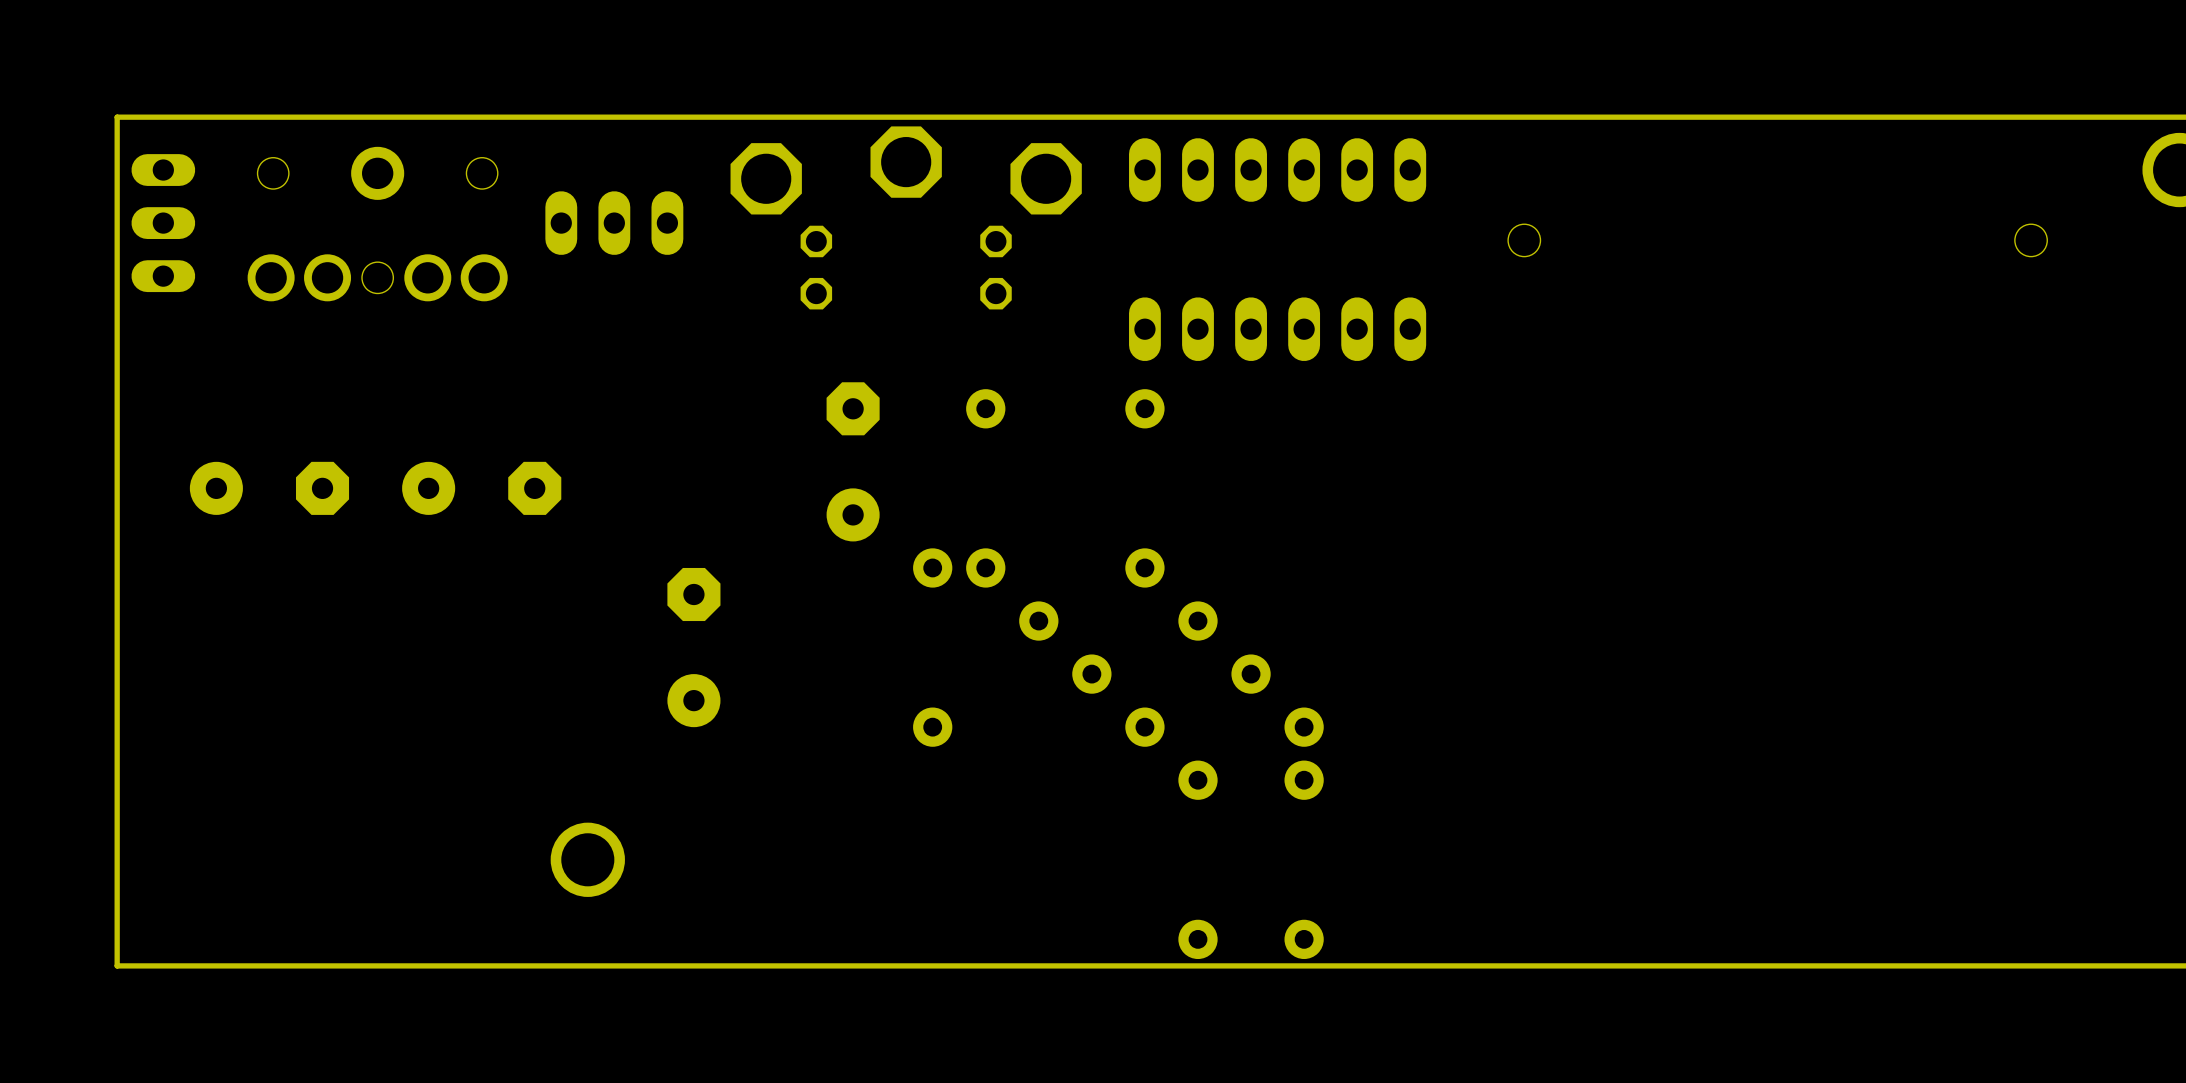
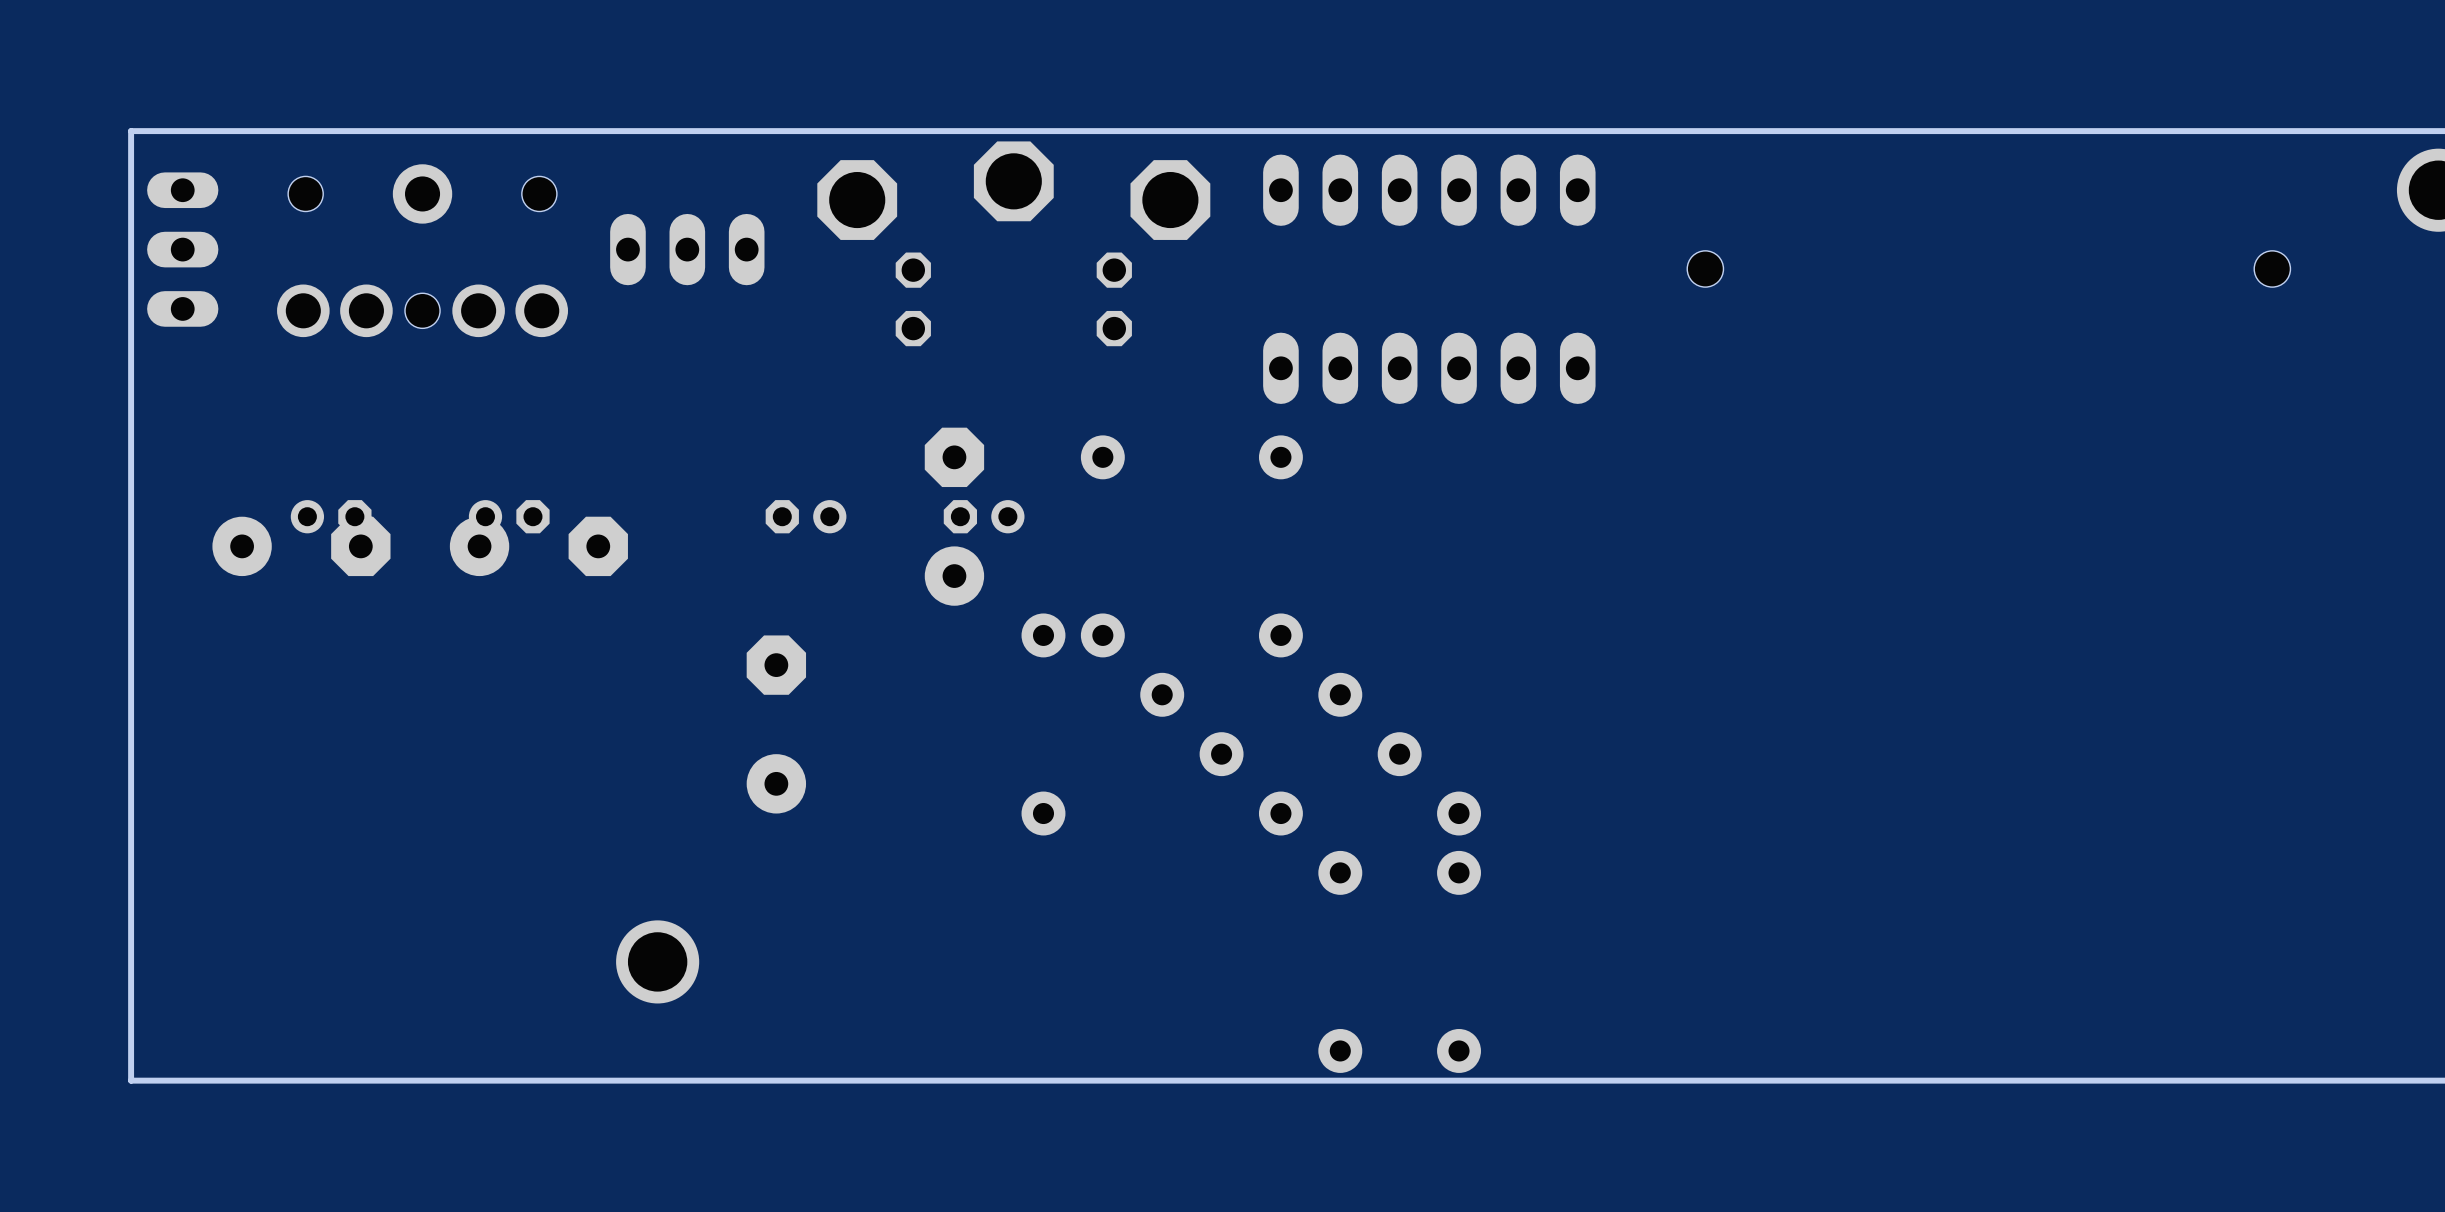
part: none -> (331, 516)
part: none -> (509, 516)
part: none -> (806, 516)
part: none -> (984, 516)

